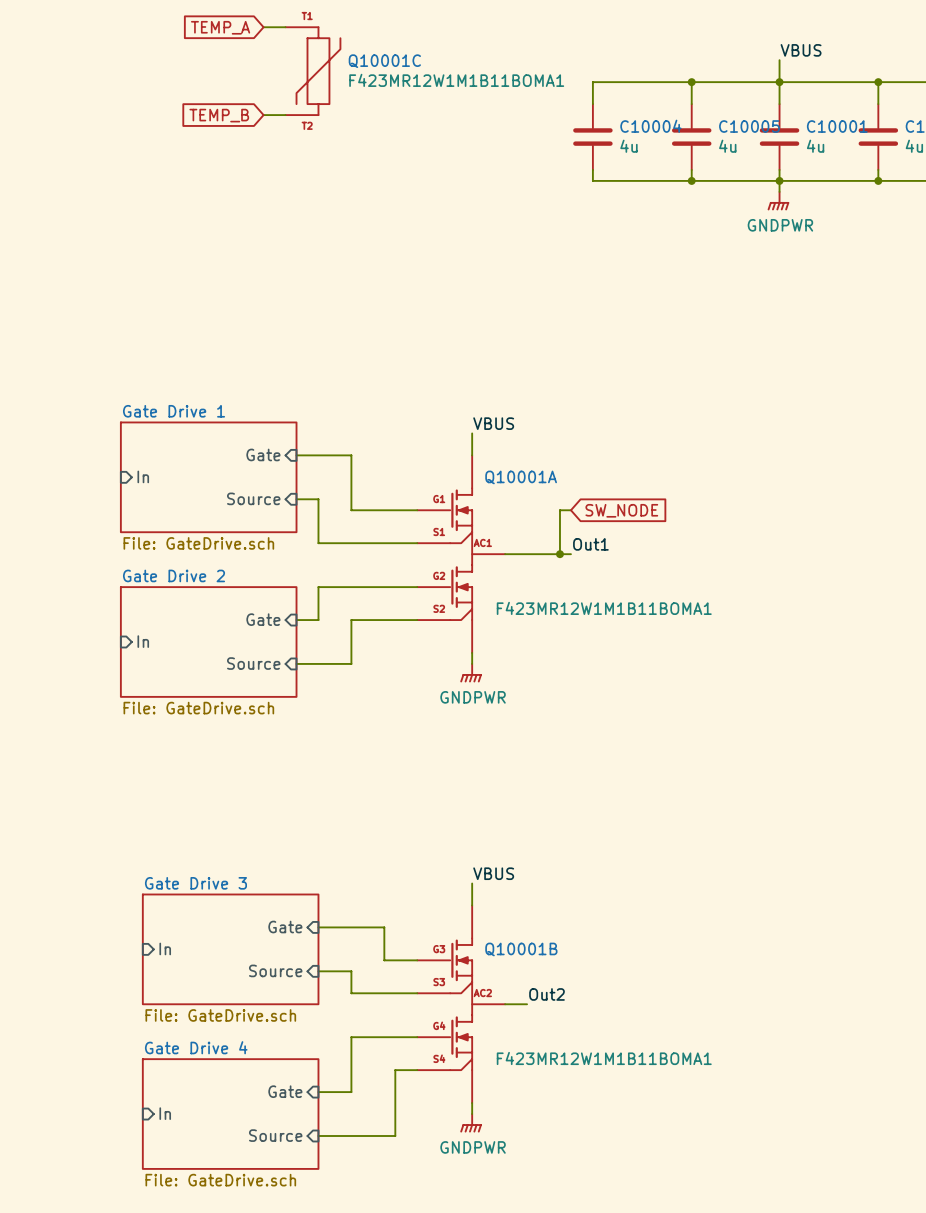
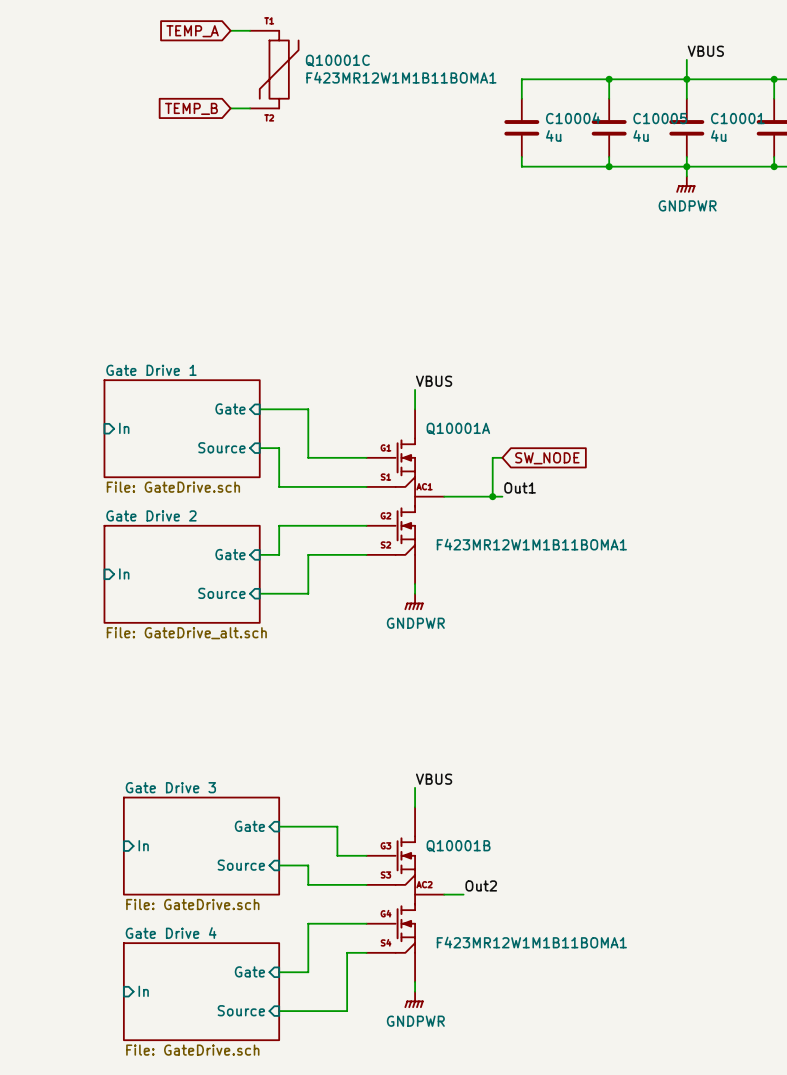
sheet Gate Drive 2 value: File: GateDrive.sch (198, 708) -> File: GateDrive_alt.sch (186, 633)

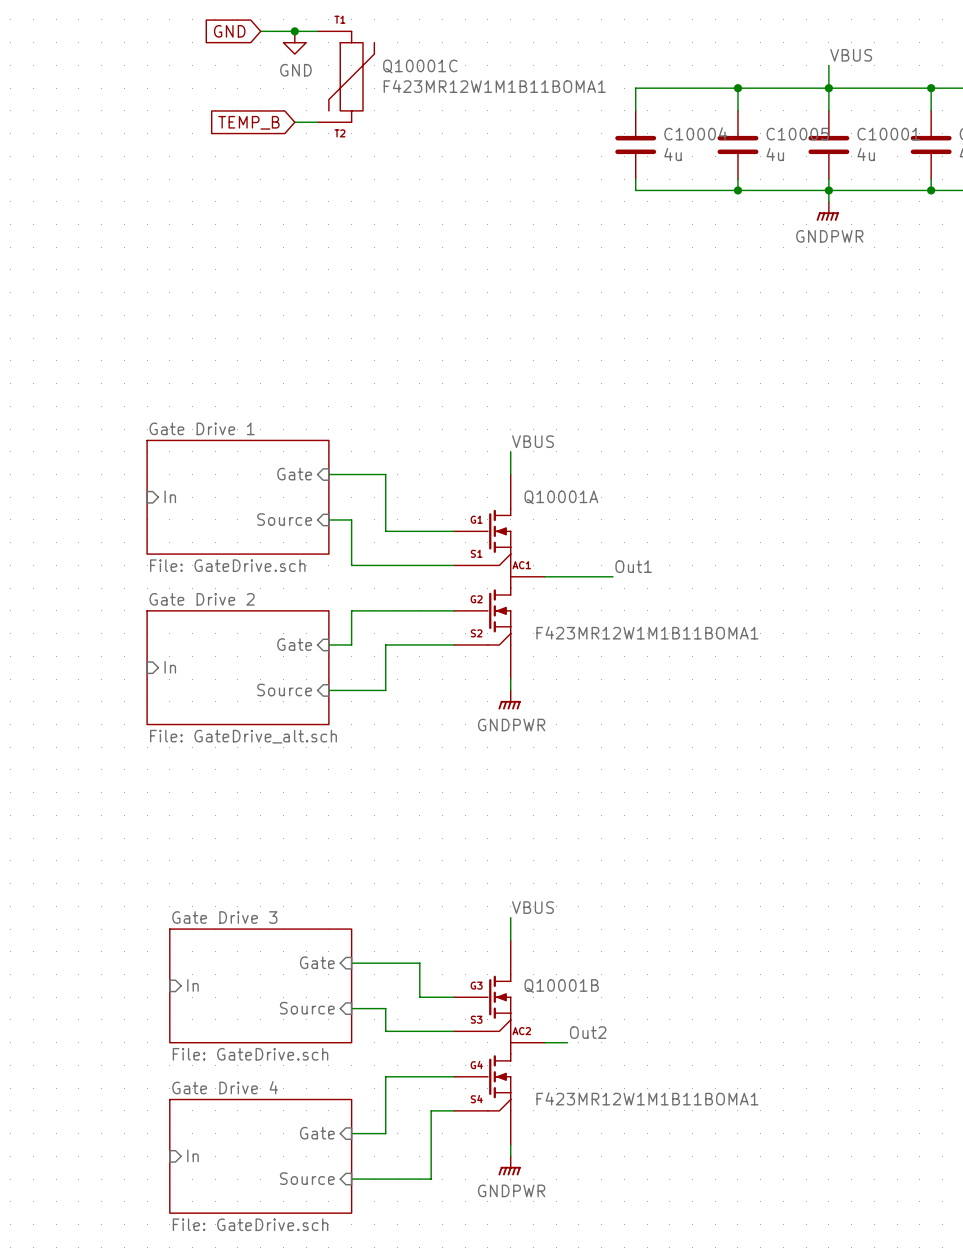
global label: none -> GND (229, 31)
wire: none -> (260, 31) (294, 31)
junction: none -> (294, 31)
global label: TEMP_A (192, 31) -> none
power symbol: none -> GND (294, 42)
wire: (502, 457) (492, 457) (492, 496) -> none
global label: SW_NODE (547, 458) -> none
junction: (492, 496) -> none

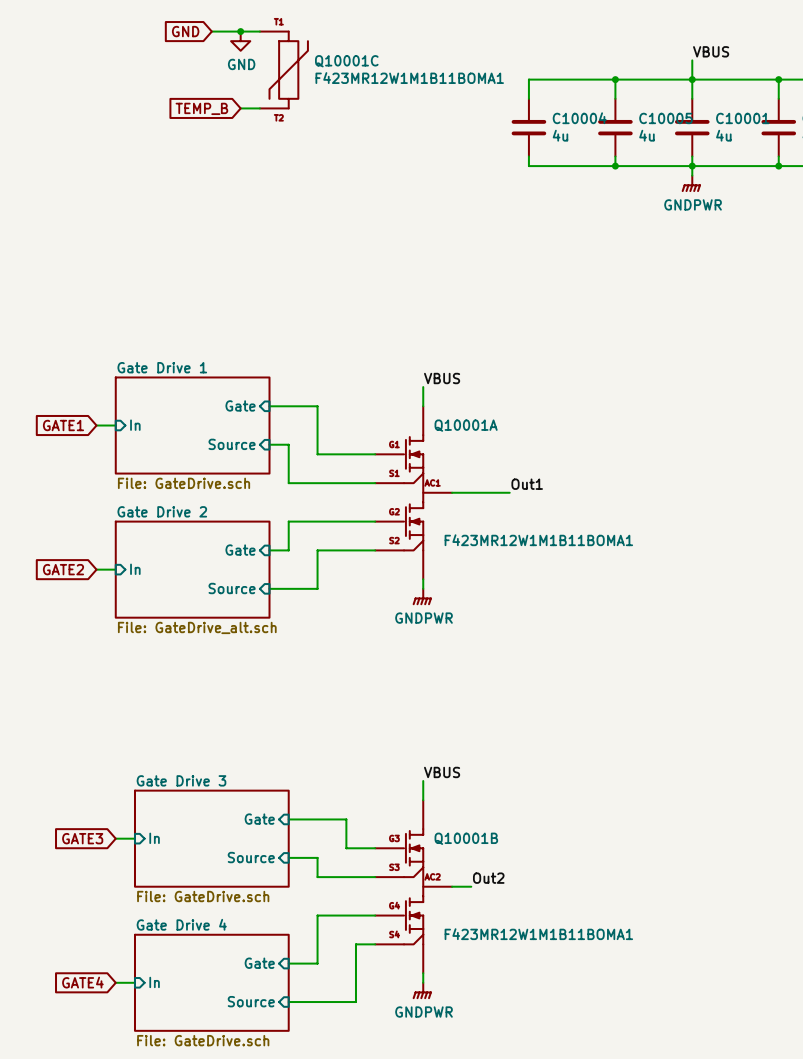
global label: none -> GATE1 (63, 425)
wire: none -> (96, 425) (115, 425)
global label: none -> GATE2 (63, 569)
wire: none -> (96, 569) (115, 569)
global label: none -> GATE3 (82, 838)
wire: none -> (115, 838) (134, 838)
global label: none -> GATE4 (82, 982)
wire: none -> (115, 982) (134, 982)

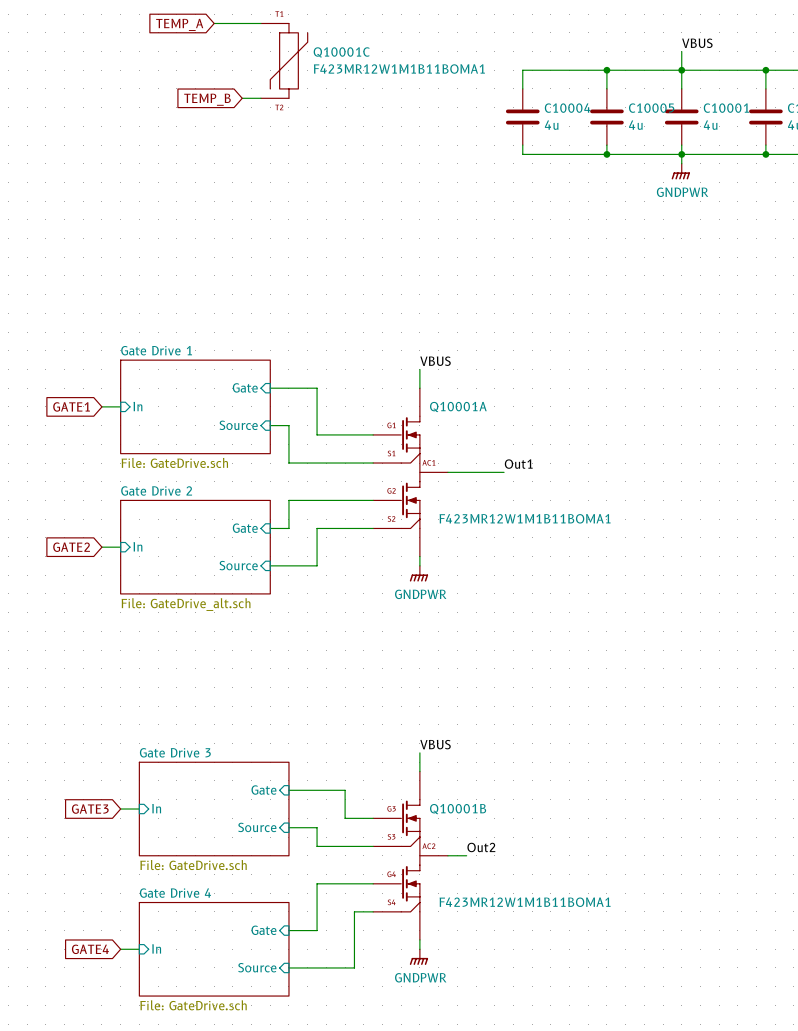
global label: GND (185, 31) -> TEMP_A (179, 24)
junction: (240, 31) -> none
power symbol: GND (240, 41) -> none

